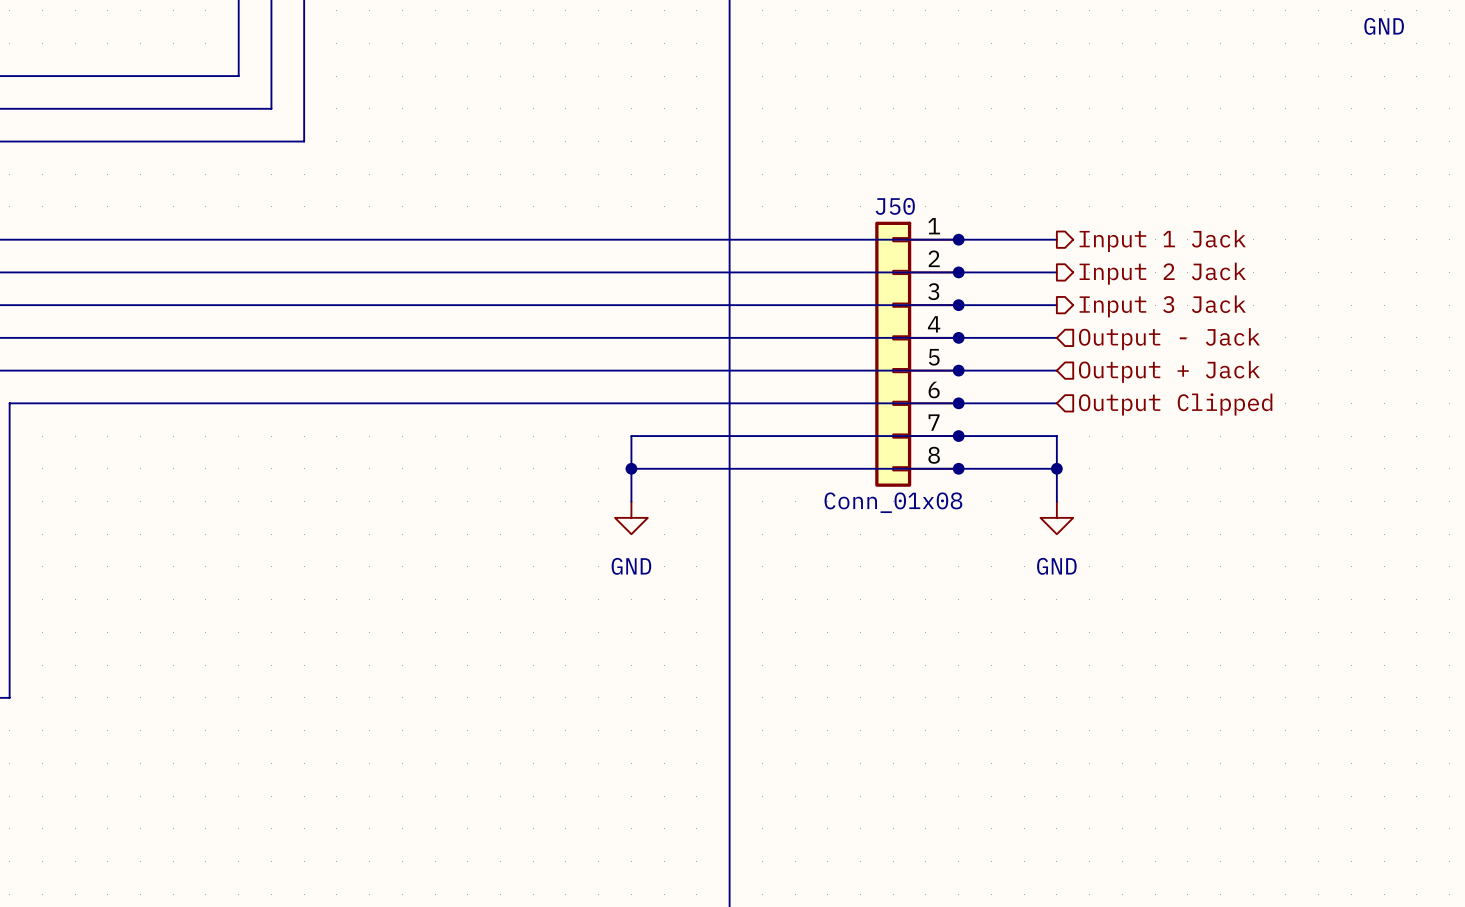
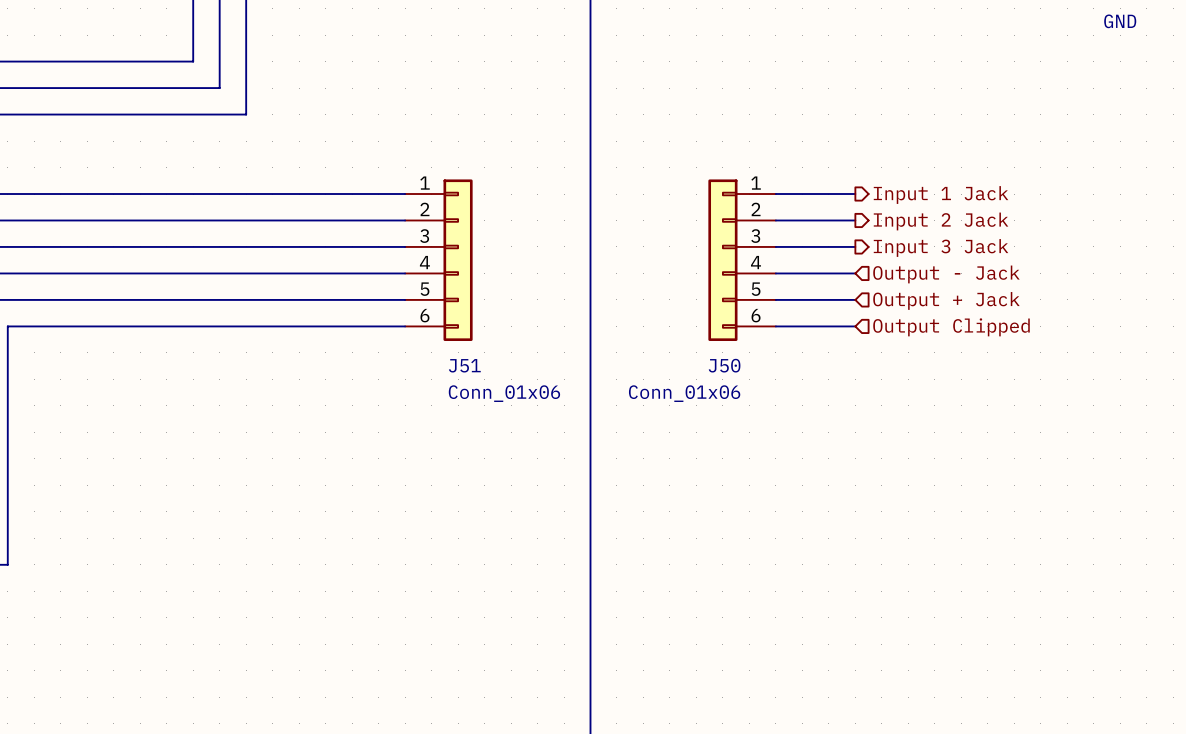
J50 name position: J50 (895, 206) -> J50 (724, 365)
J50 symbol: [875, 221, 959, 487] -> [708, 179, 776, 342]
wire: (500, 239) (958, 239) -> none
junction: (958, 239) -> none
wire: (500, 272) (958, 272) -> none
junction: (958, 272) -> none
wire: (500, 305) (958, 305) -> none
junction: (958, 305) -> none
J51: none -> Conn_01x06 (438, 260)
wire: (500, 337) (958, 337) -> none
junction: (958, 337) -> none
wire: (500, 370) (958, 370) -> none
junction: (958, 370) -> none
wire: (500, 403) (958, 403) -> none
junction: (958, 403) -> none
junction: (958, 436) -> none
wire: (631, 468) (1056, 468) -> none
junction: (631, 468) -> none
junction: (958, 468) -> none
junction: (1056, 468) -> none
wire: (631, 501) (631, 436) (1056, 436) (1056, 501) -> none
J50 value: Conn_01x08 (893, 502) -> Conn_01x06 (684, 393)
power symbol: GND (631, 517) -> none
power symbol: GND (1056, 517) -> none

